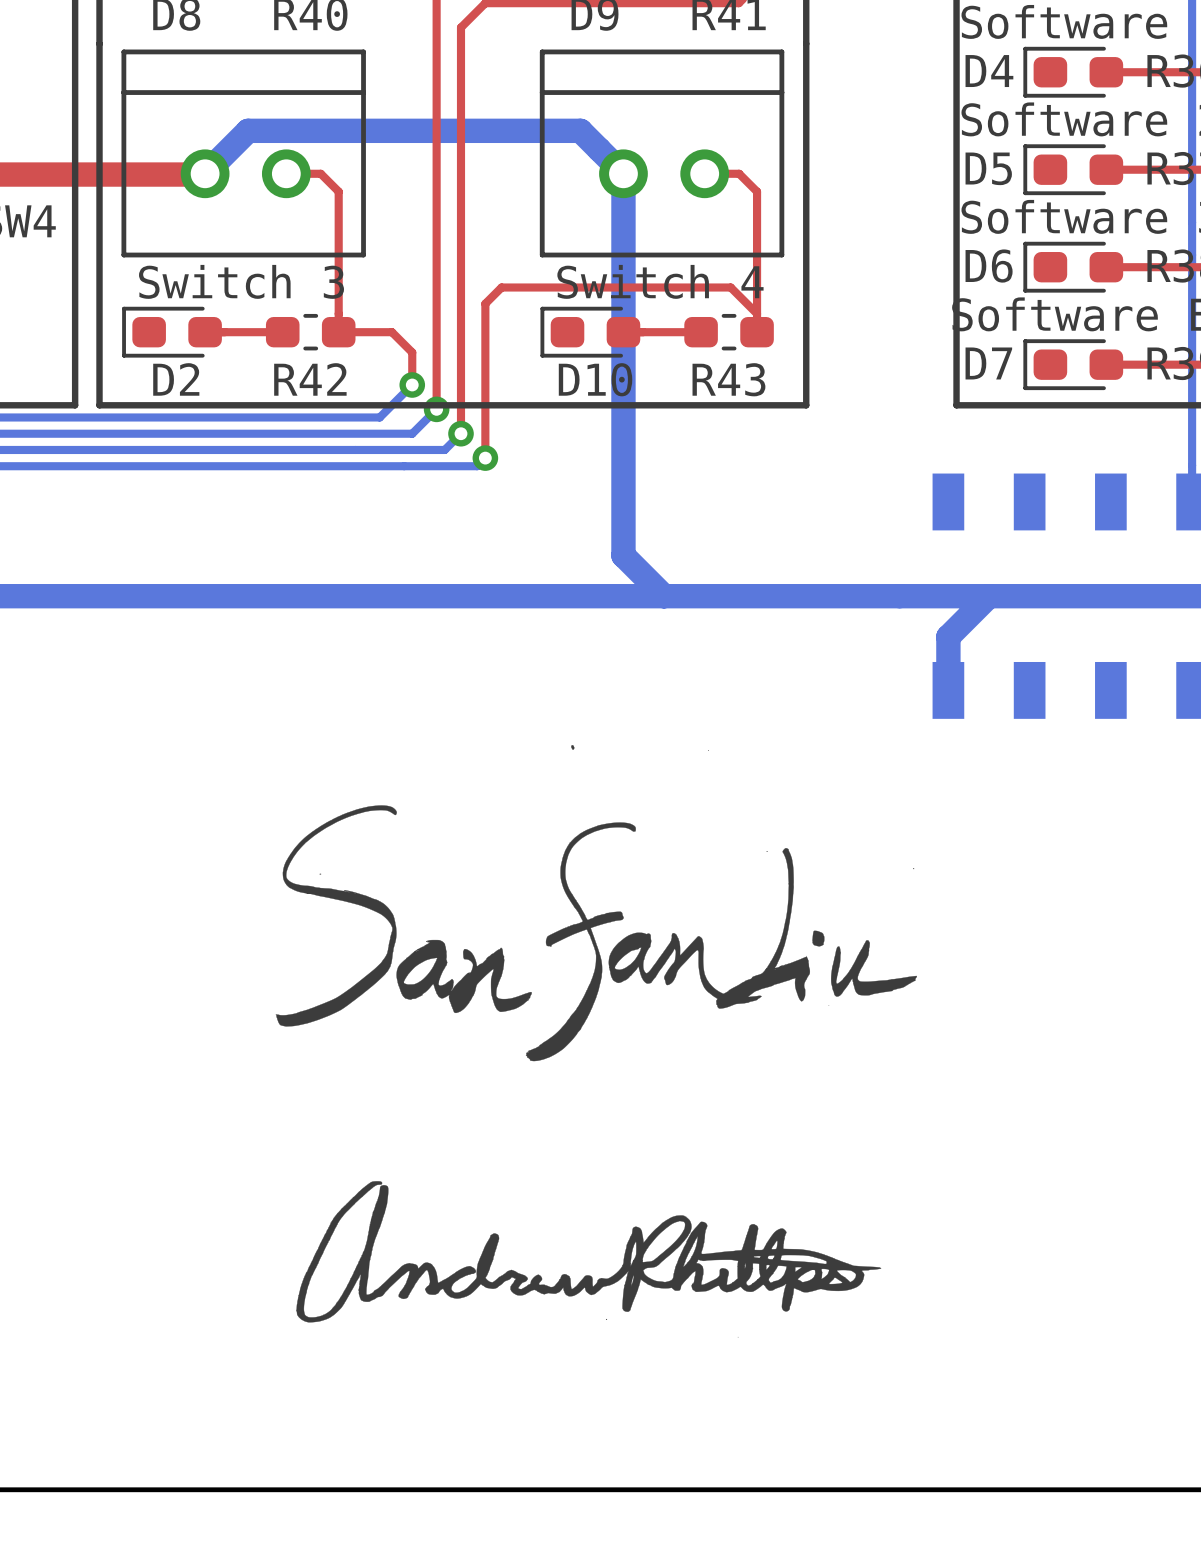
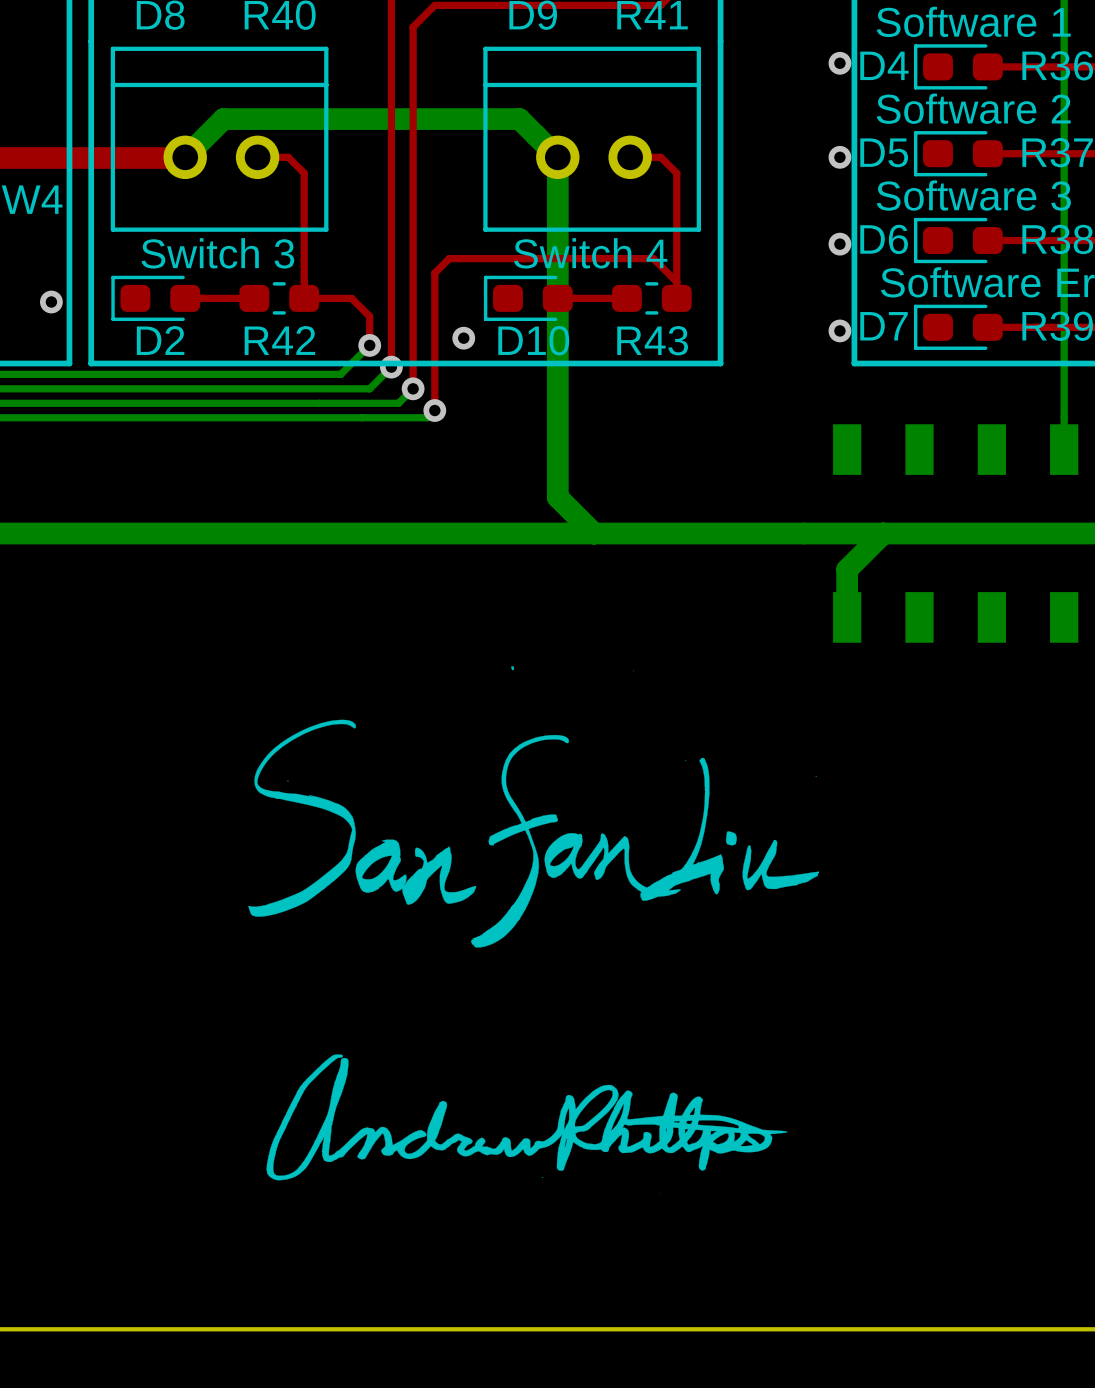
via: none -> (839, 63)
via: none -> (839, 157)
via: none -> (839, 244)
via: none -> (51, 302)
via: none -> (839, 330)
via: none -> (463, 338)

